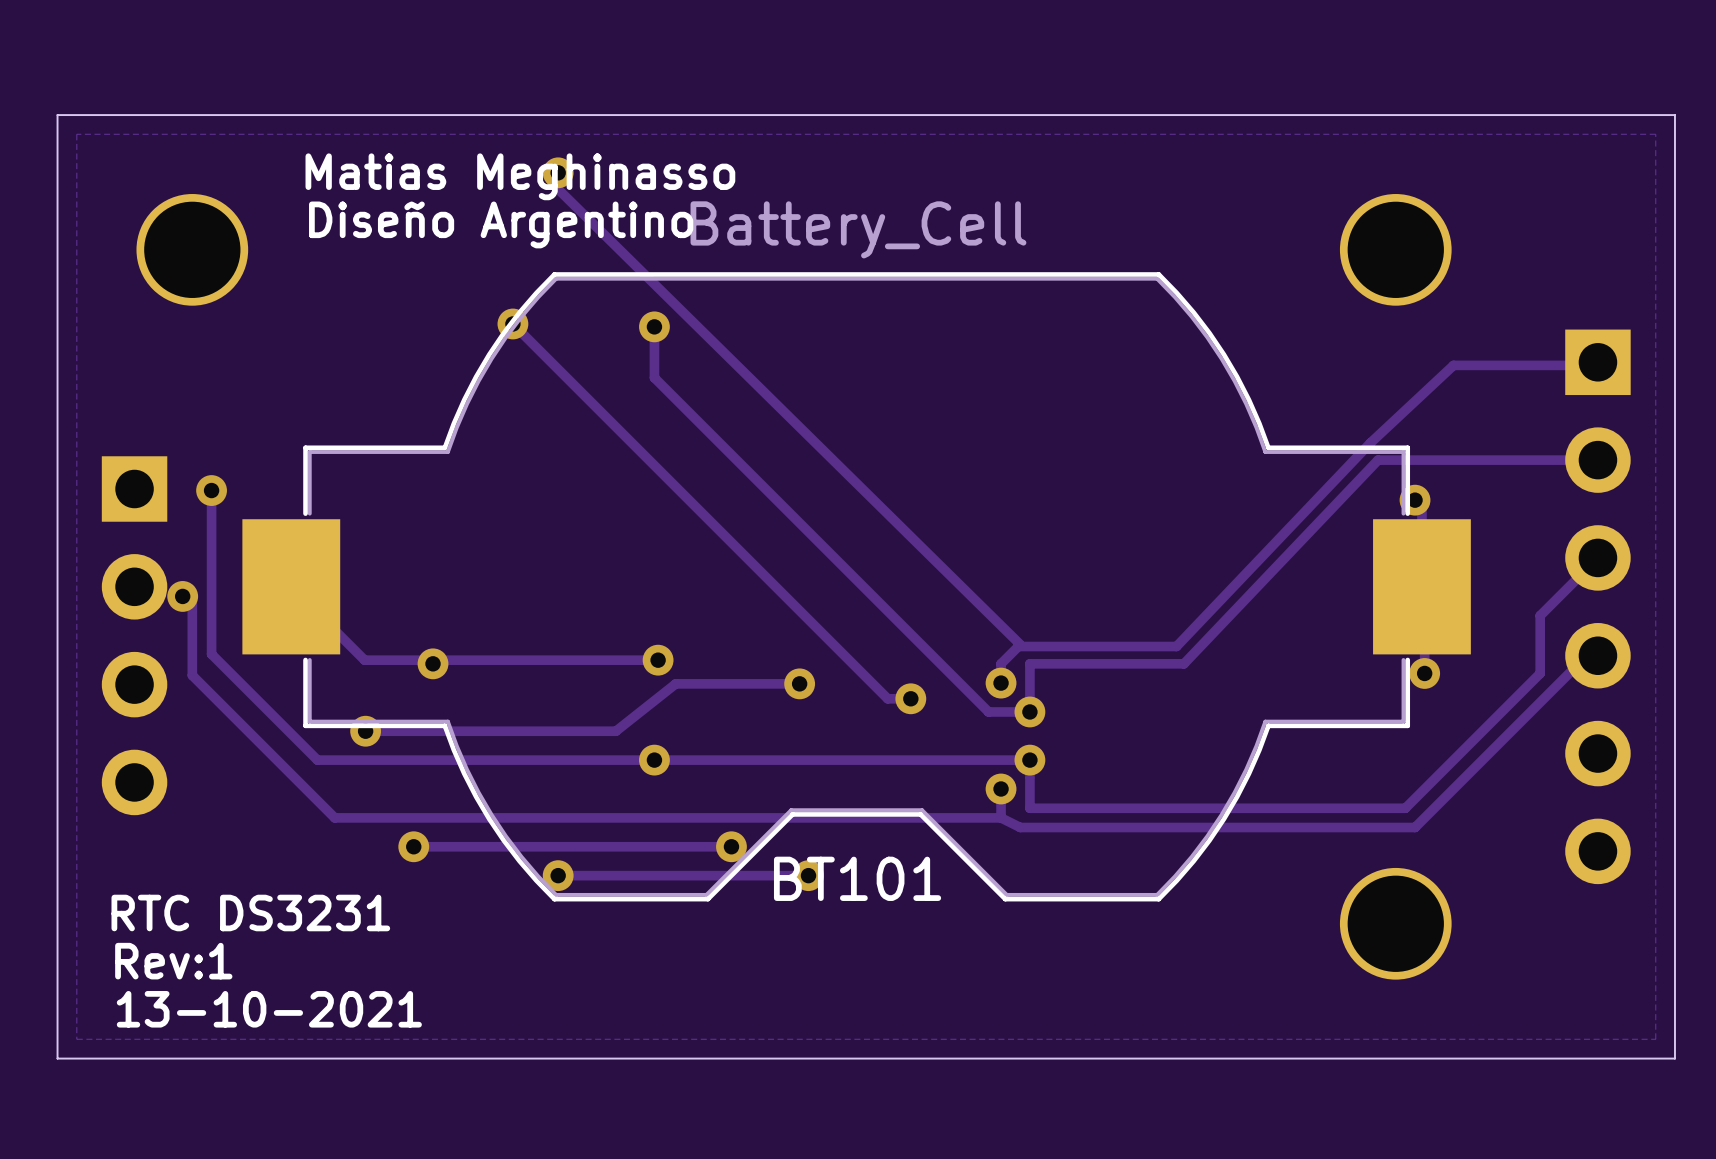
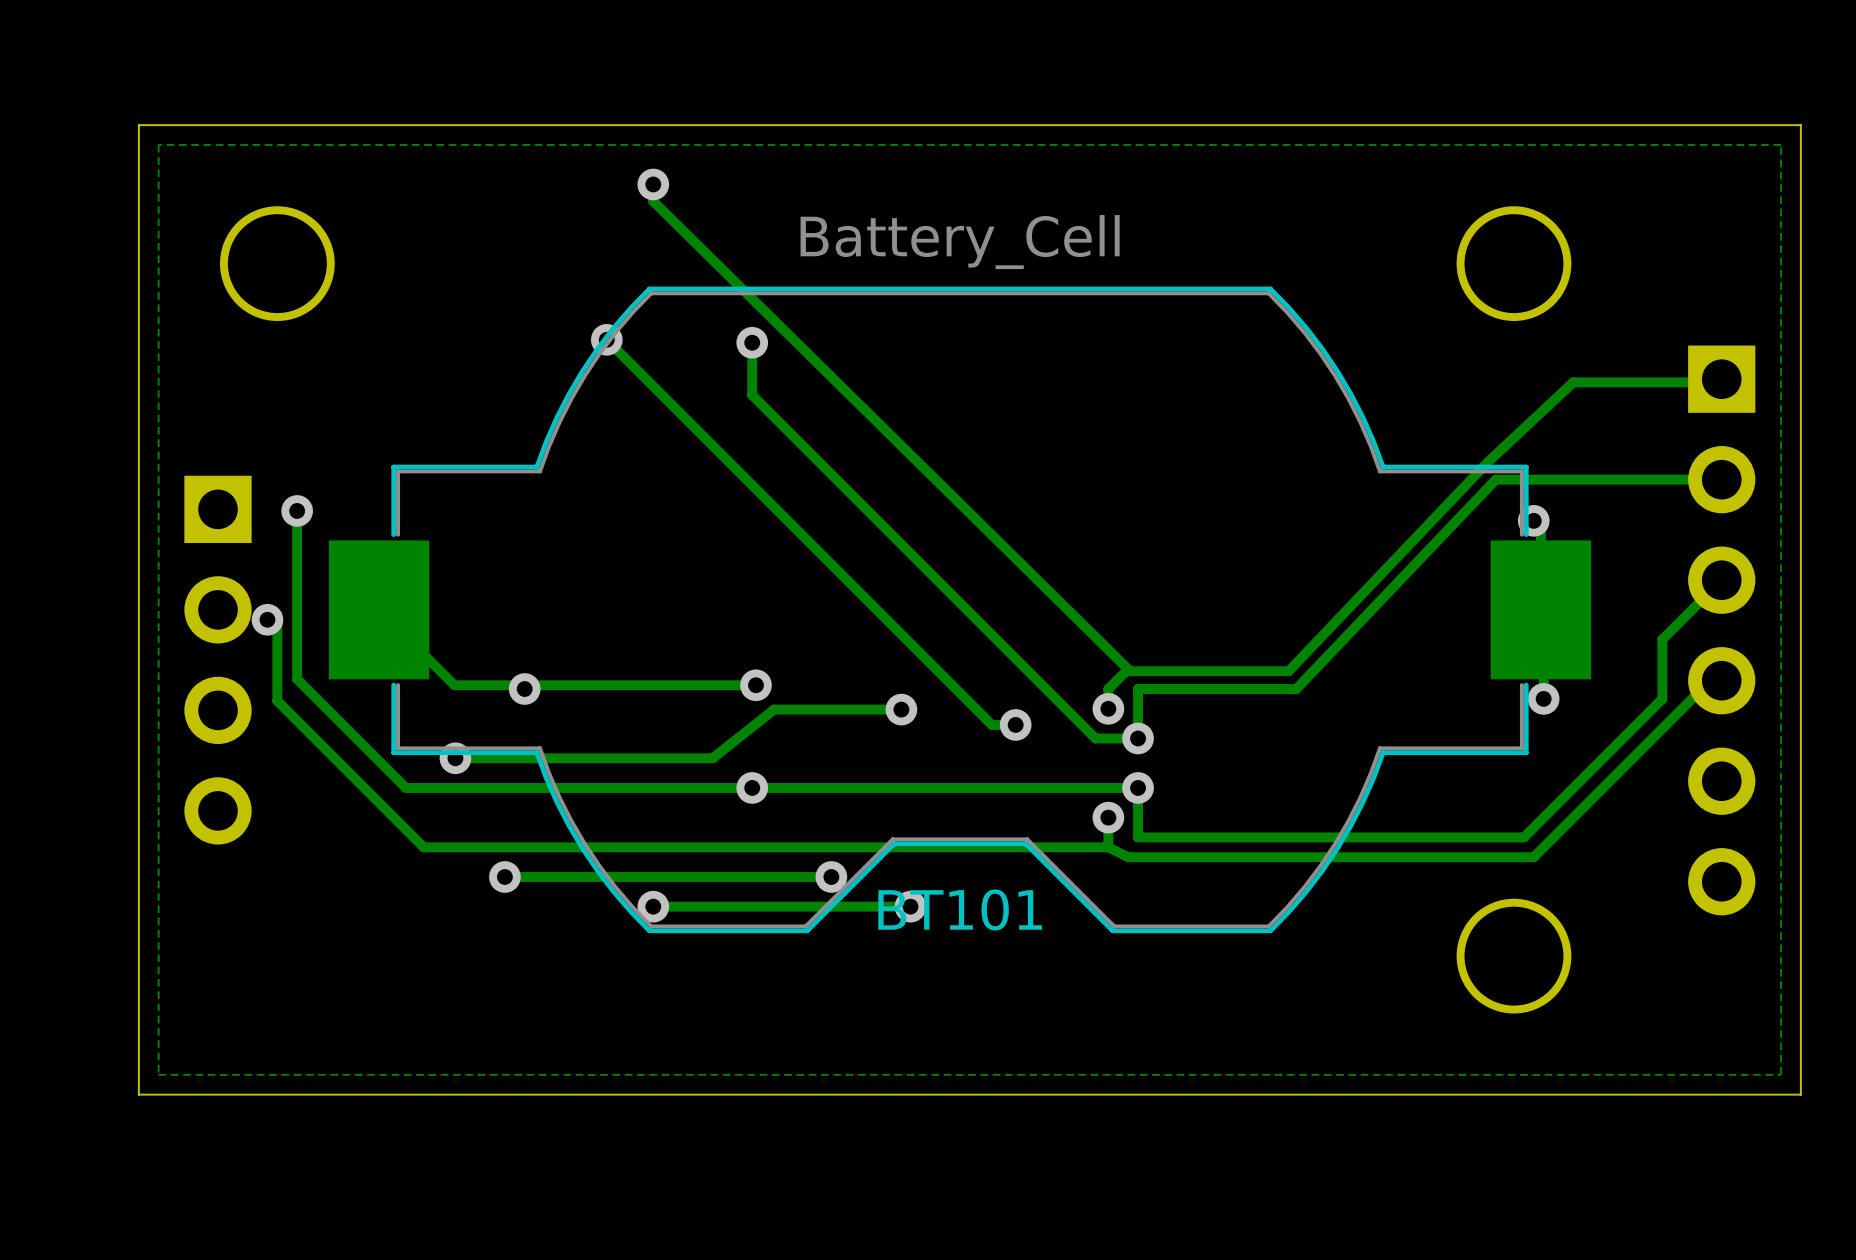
text: Matias Meghinasso (520, 176) -> none
text: Diseño Argentino (501, 224) -> none
text: RTC DS3231 (250, 913) -> none
text: Rev:1 (173, 961) -> none
text: 13-10-2021 (269, 1009) -> none

